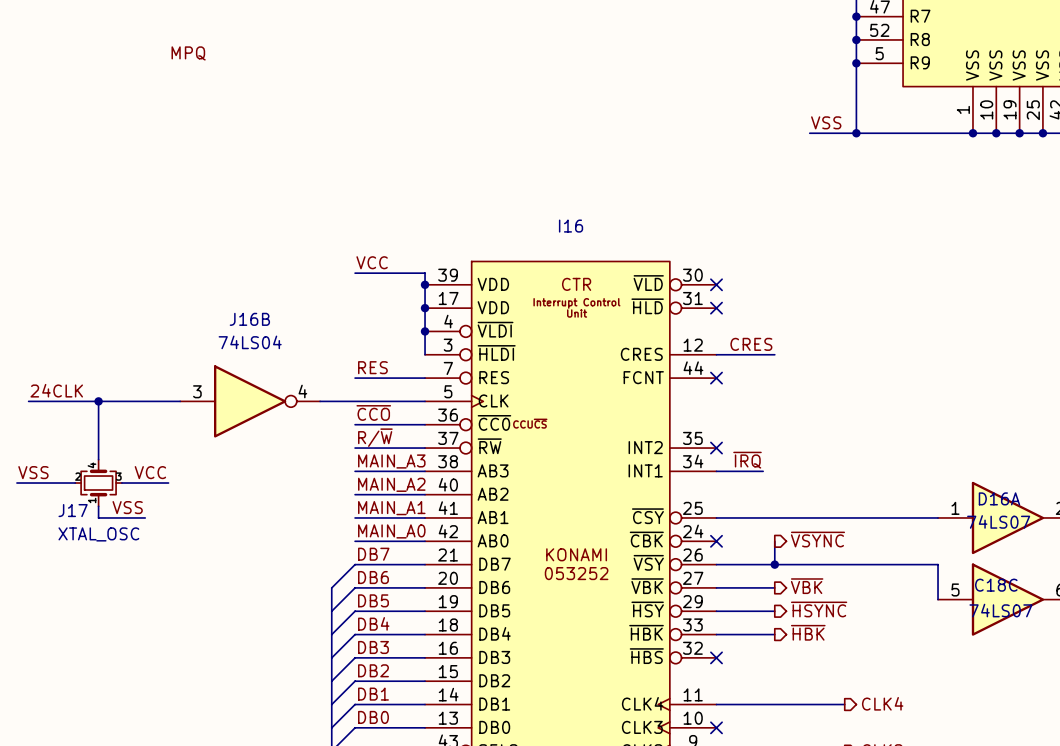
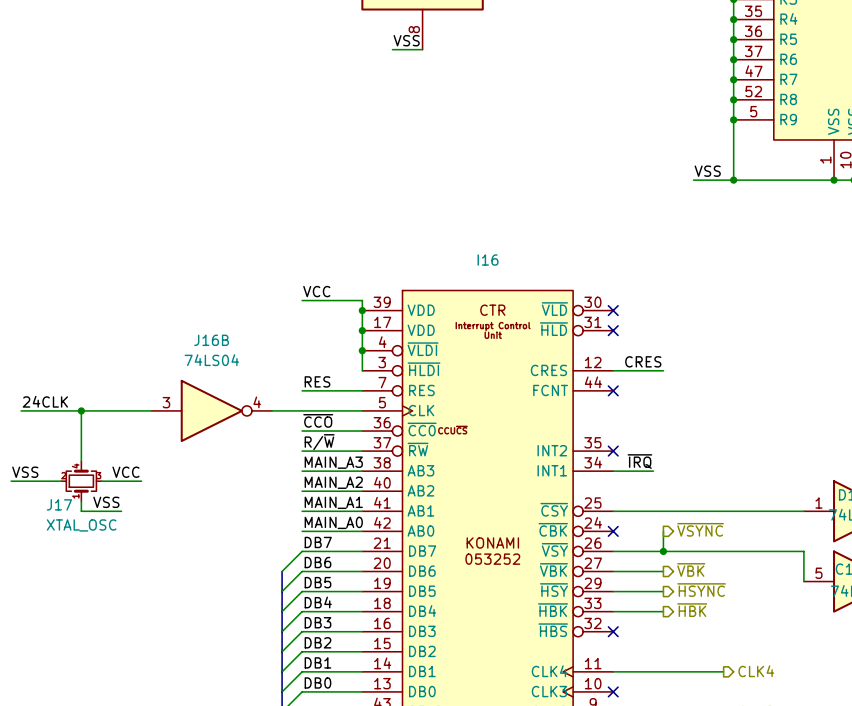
label: MPQ (188, 53) -> none

